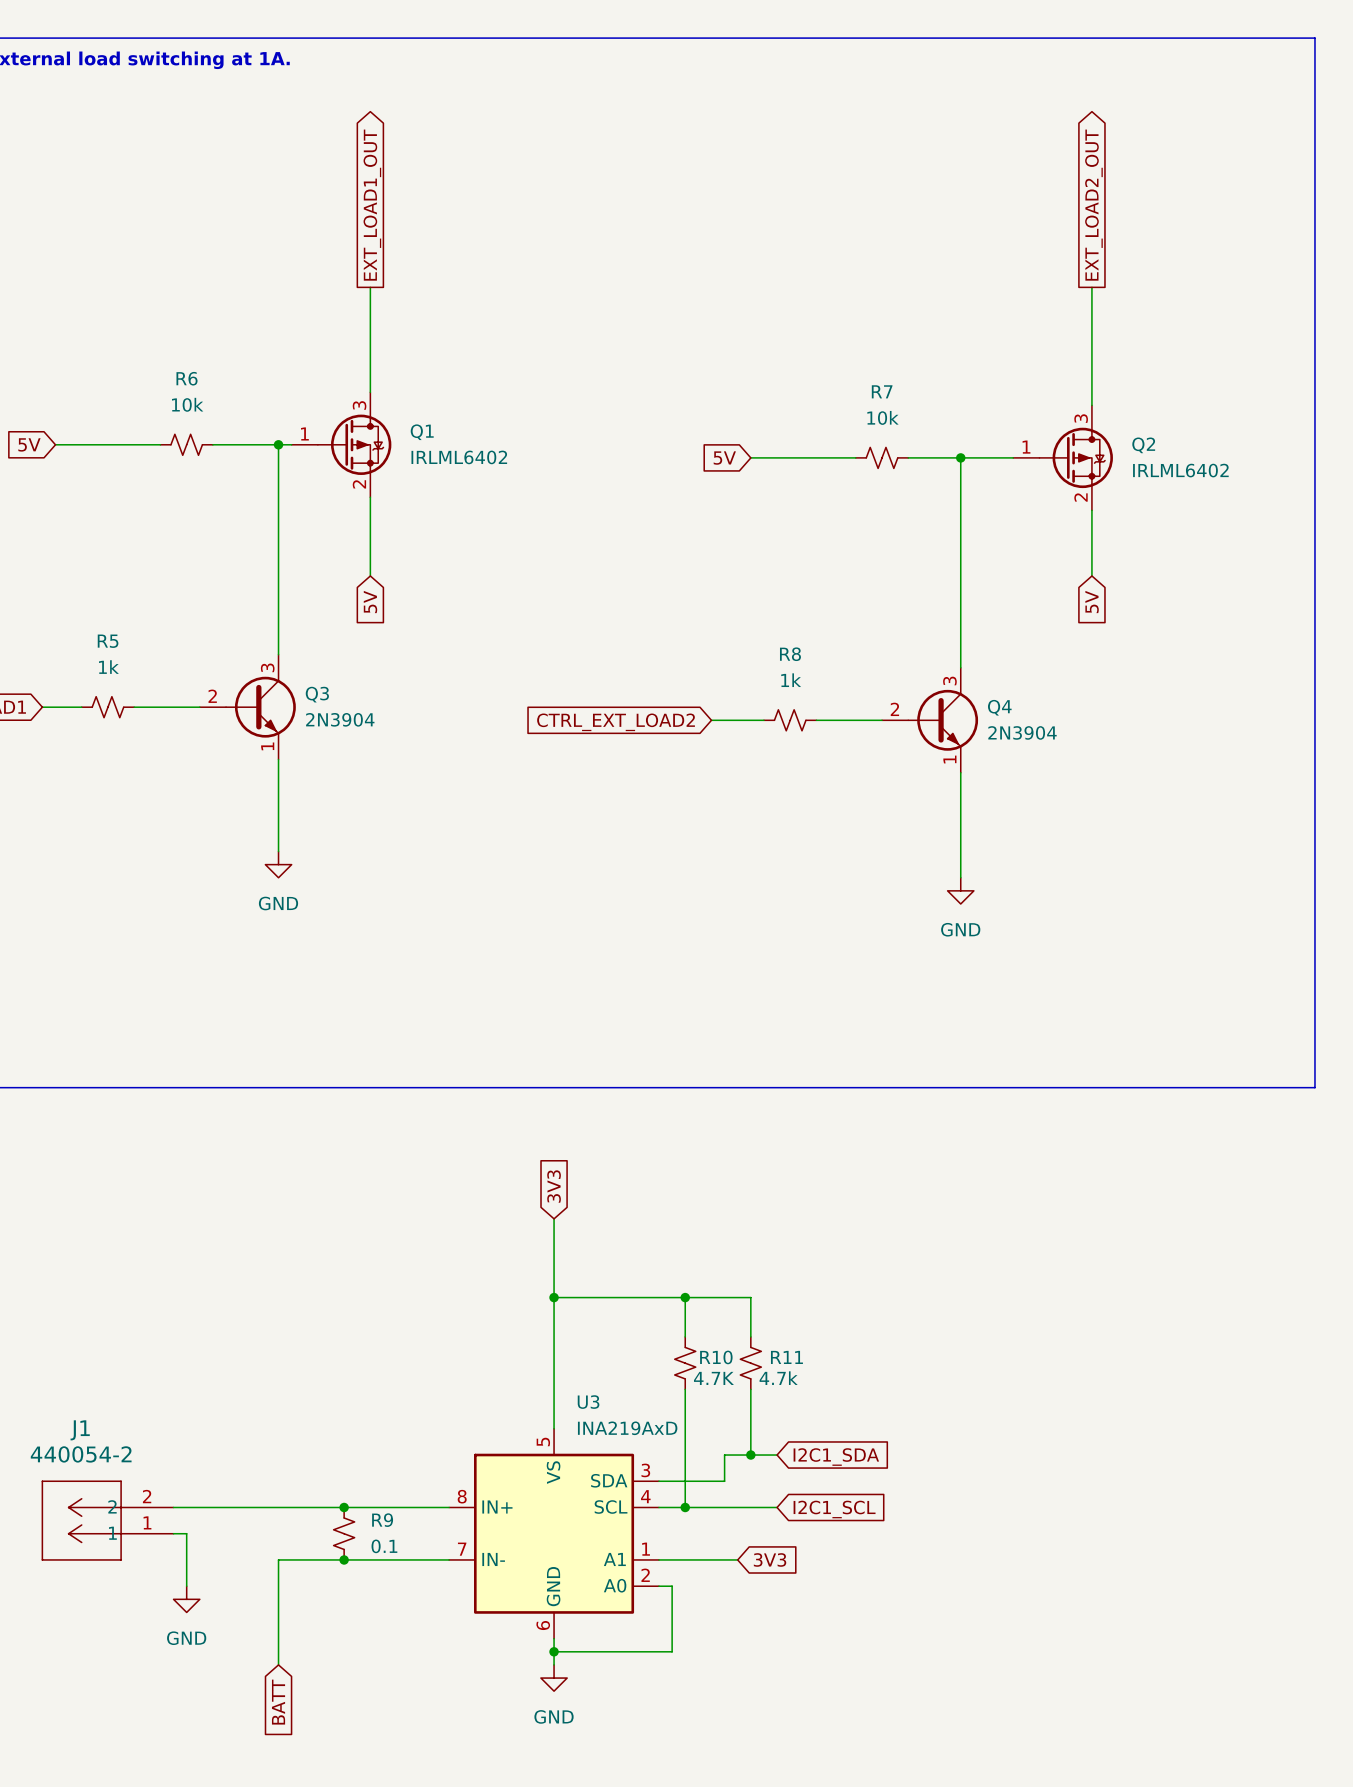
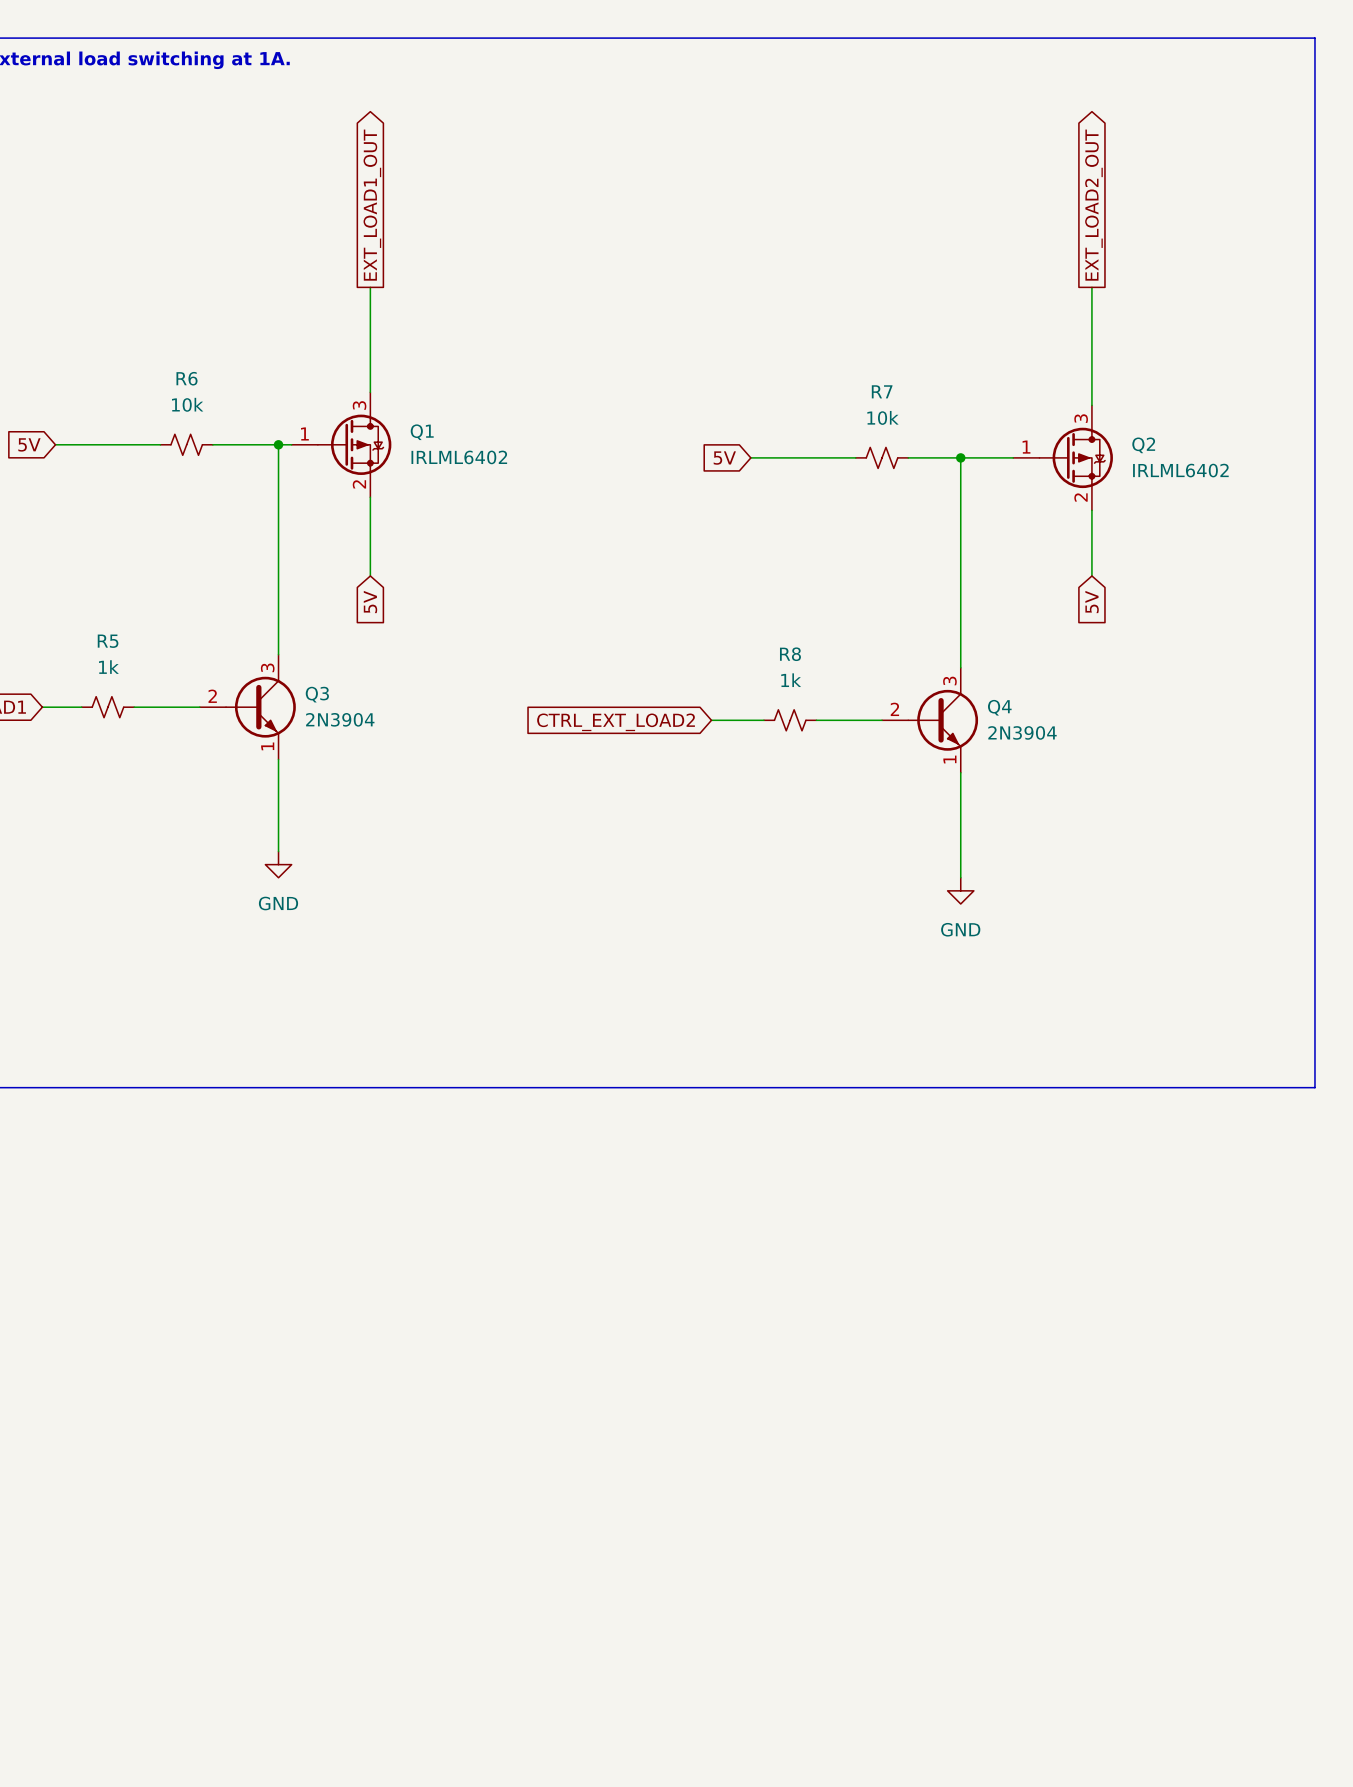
global label: 3V3 (554, 1186) -> none
wire: (554, 1218) (554, 1428) -> none
wire: (554, 1297) (750, 1297) (750, 1336) -> none
junction: (554, 1297) -> none
wire: (685, 1297) (685, 1336) -> none
junction: (685, 1297) -> none
R10: 4.7K (685, 1363) -> none
R11: 4.7k (750, 1363) -> none
wire: (685, 1389) (685, 1507) -> none
wire: (750, 1389) (750, 1455) -> none
junction: (750, 1455) -> none
wire: (777, 1455) (724, 1455) (724, 1481) (658, 1481) -> none
global label: I2C1_SDA (836, 1457) -> none
wire: (173, 1507) (449, 1507) -> none
junction: (344, 1507) -> none
wire: (658, 1507) (777, 1507) -> none
junction: (685, 1507) -> none
global label: I2C1_SCL (834, 1509) -> none
J1: 440054-2 (107, 1520) -> none
wire: (173, 1533) (186, 1533) (186, 1586) -> none
R9: 0.1 (344, 1533) -> none
U3: INA219AxD (554, 1533) -> none
junction: (344, 1559) -> none
wire: (449, 1559) (278, 1559) (278, 1664) -> none
wire: (658, 1559) (737, 1559) -> none
global label: 3V3 (770, 1559) -> none
wire: (658, 1586) (672, 1586) (672, 1651) (554, 1651) -> none
power symbol: GND (186, 1599) -> none
wire: (554, 1638) (554, 1664) -> none
junction: (554, 1651) -> none
power symbol: GND (554, 1678) -> none
global label: BATT (278, 1702) -> none

